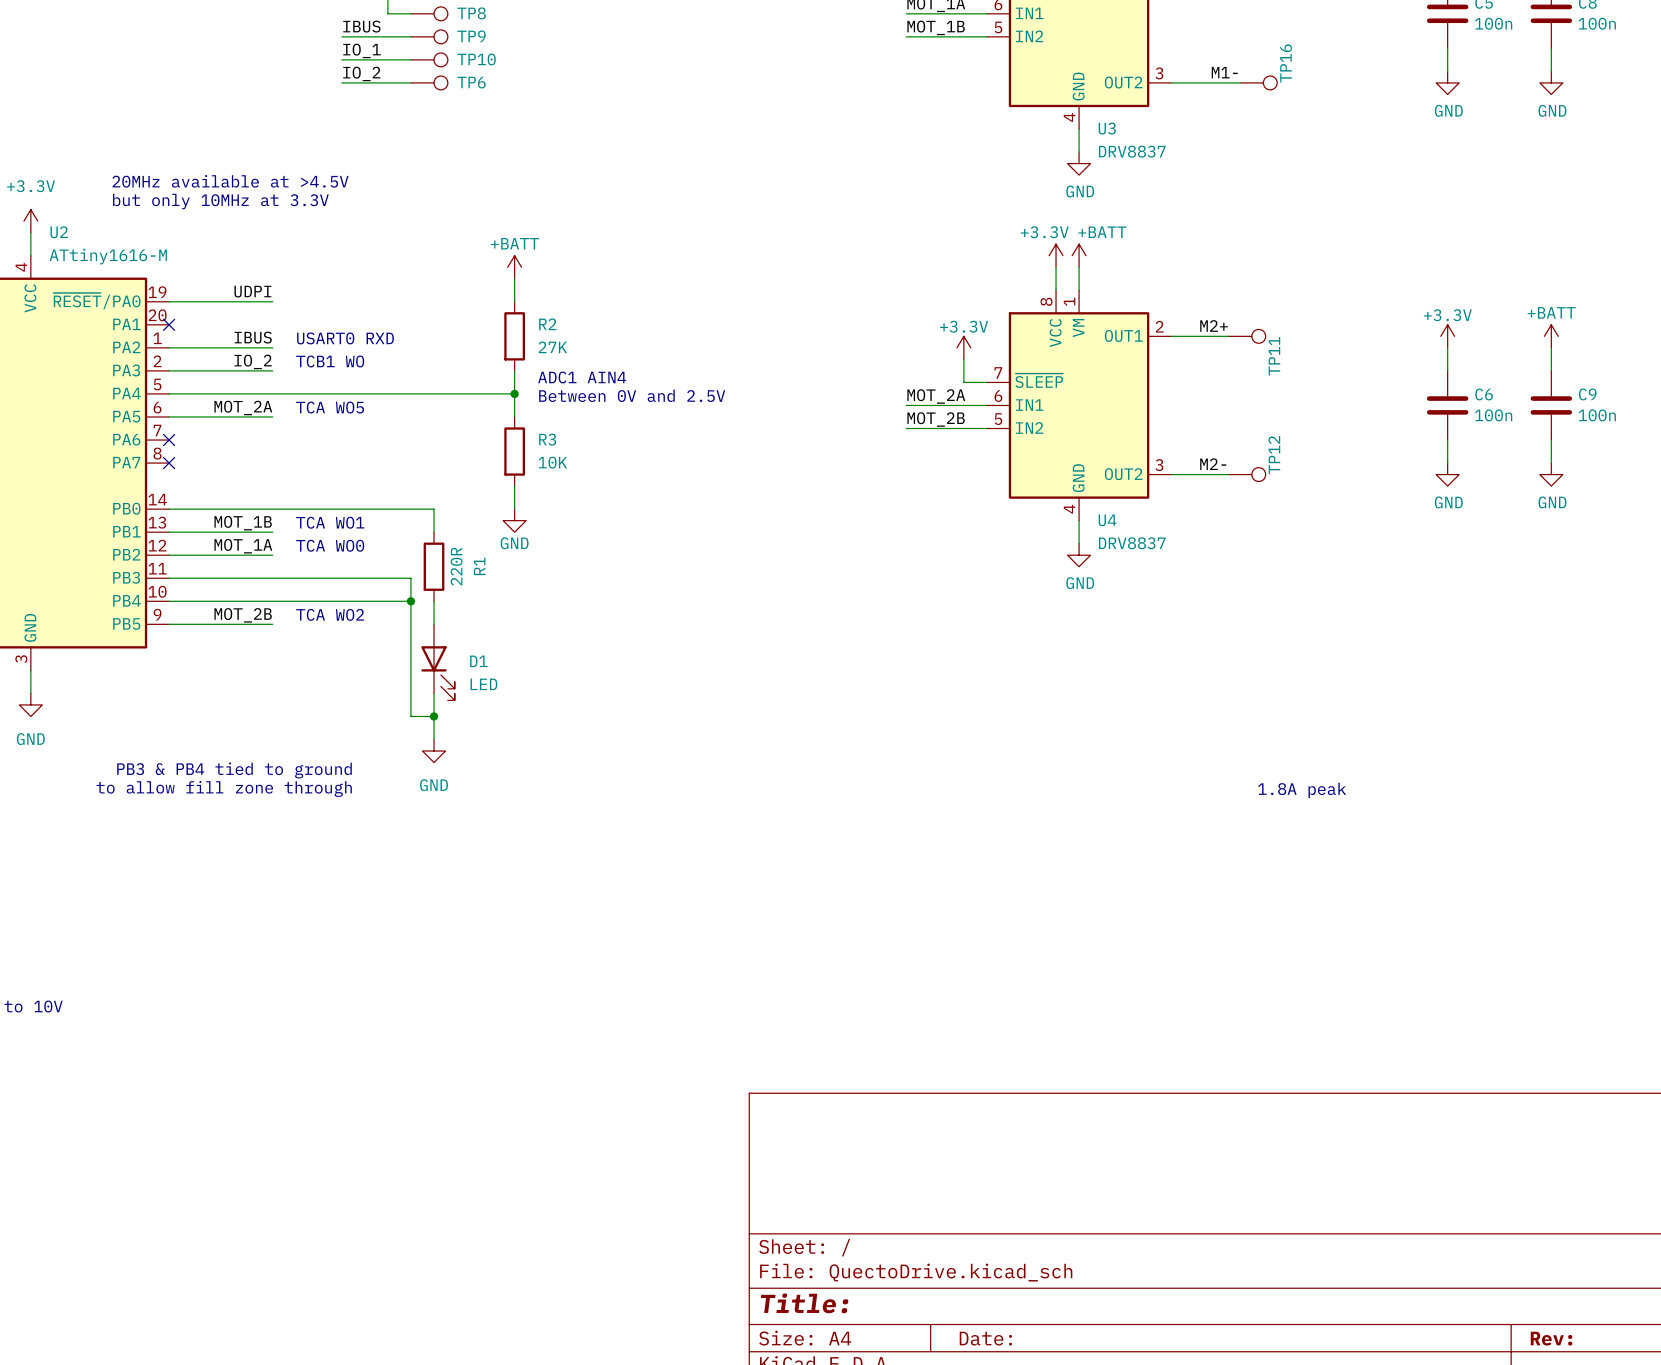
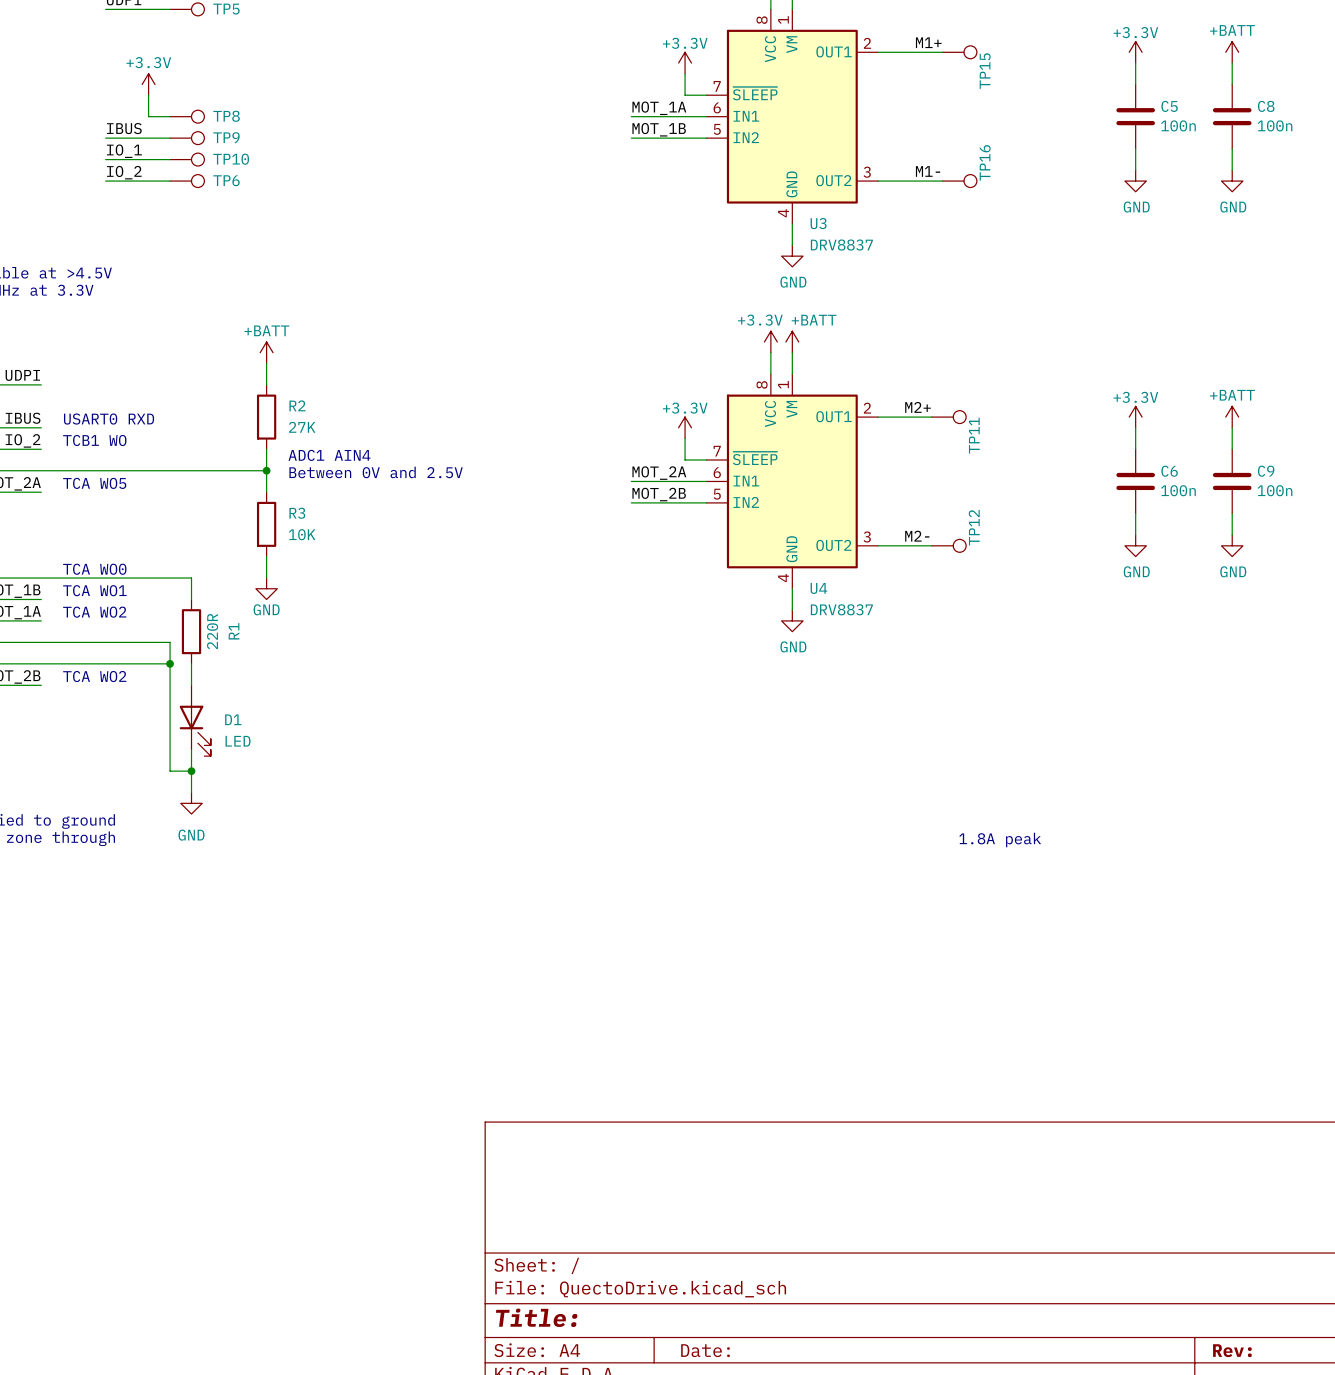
text: none -> TCA WO0 (94, 569)
text: TCA WO0 (330, 545) -> TCA WO2 (94, 612)

